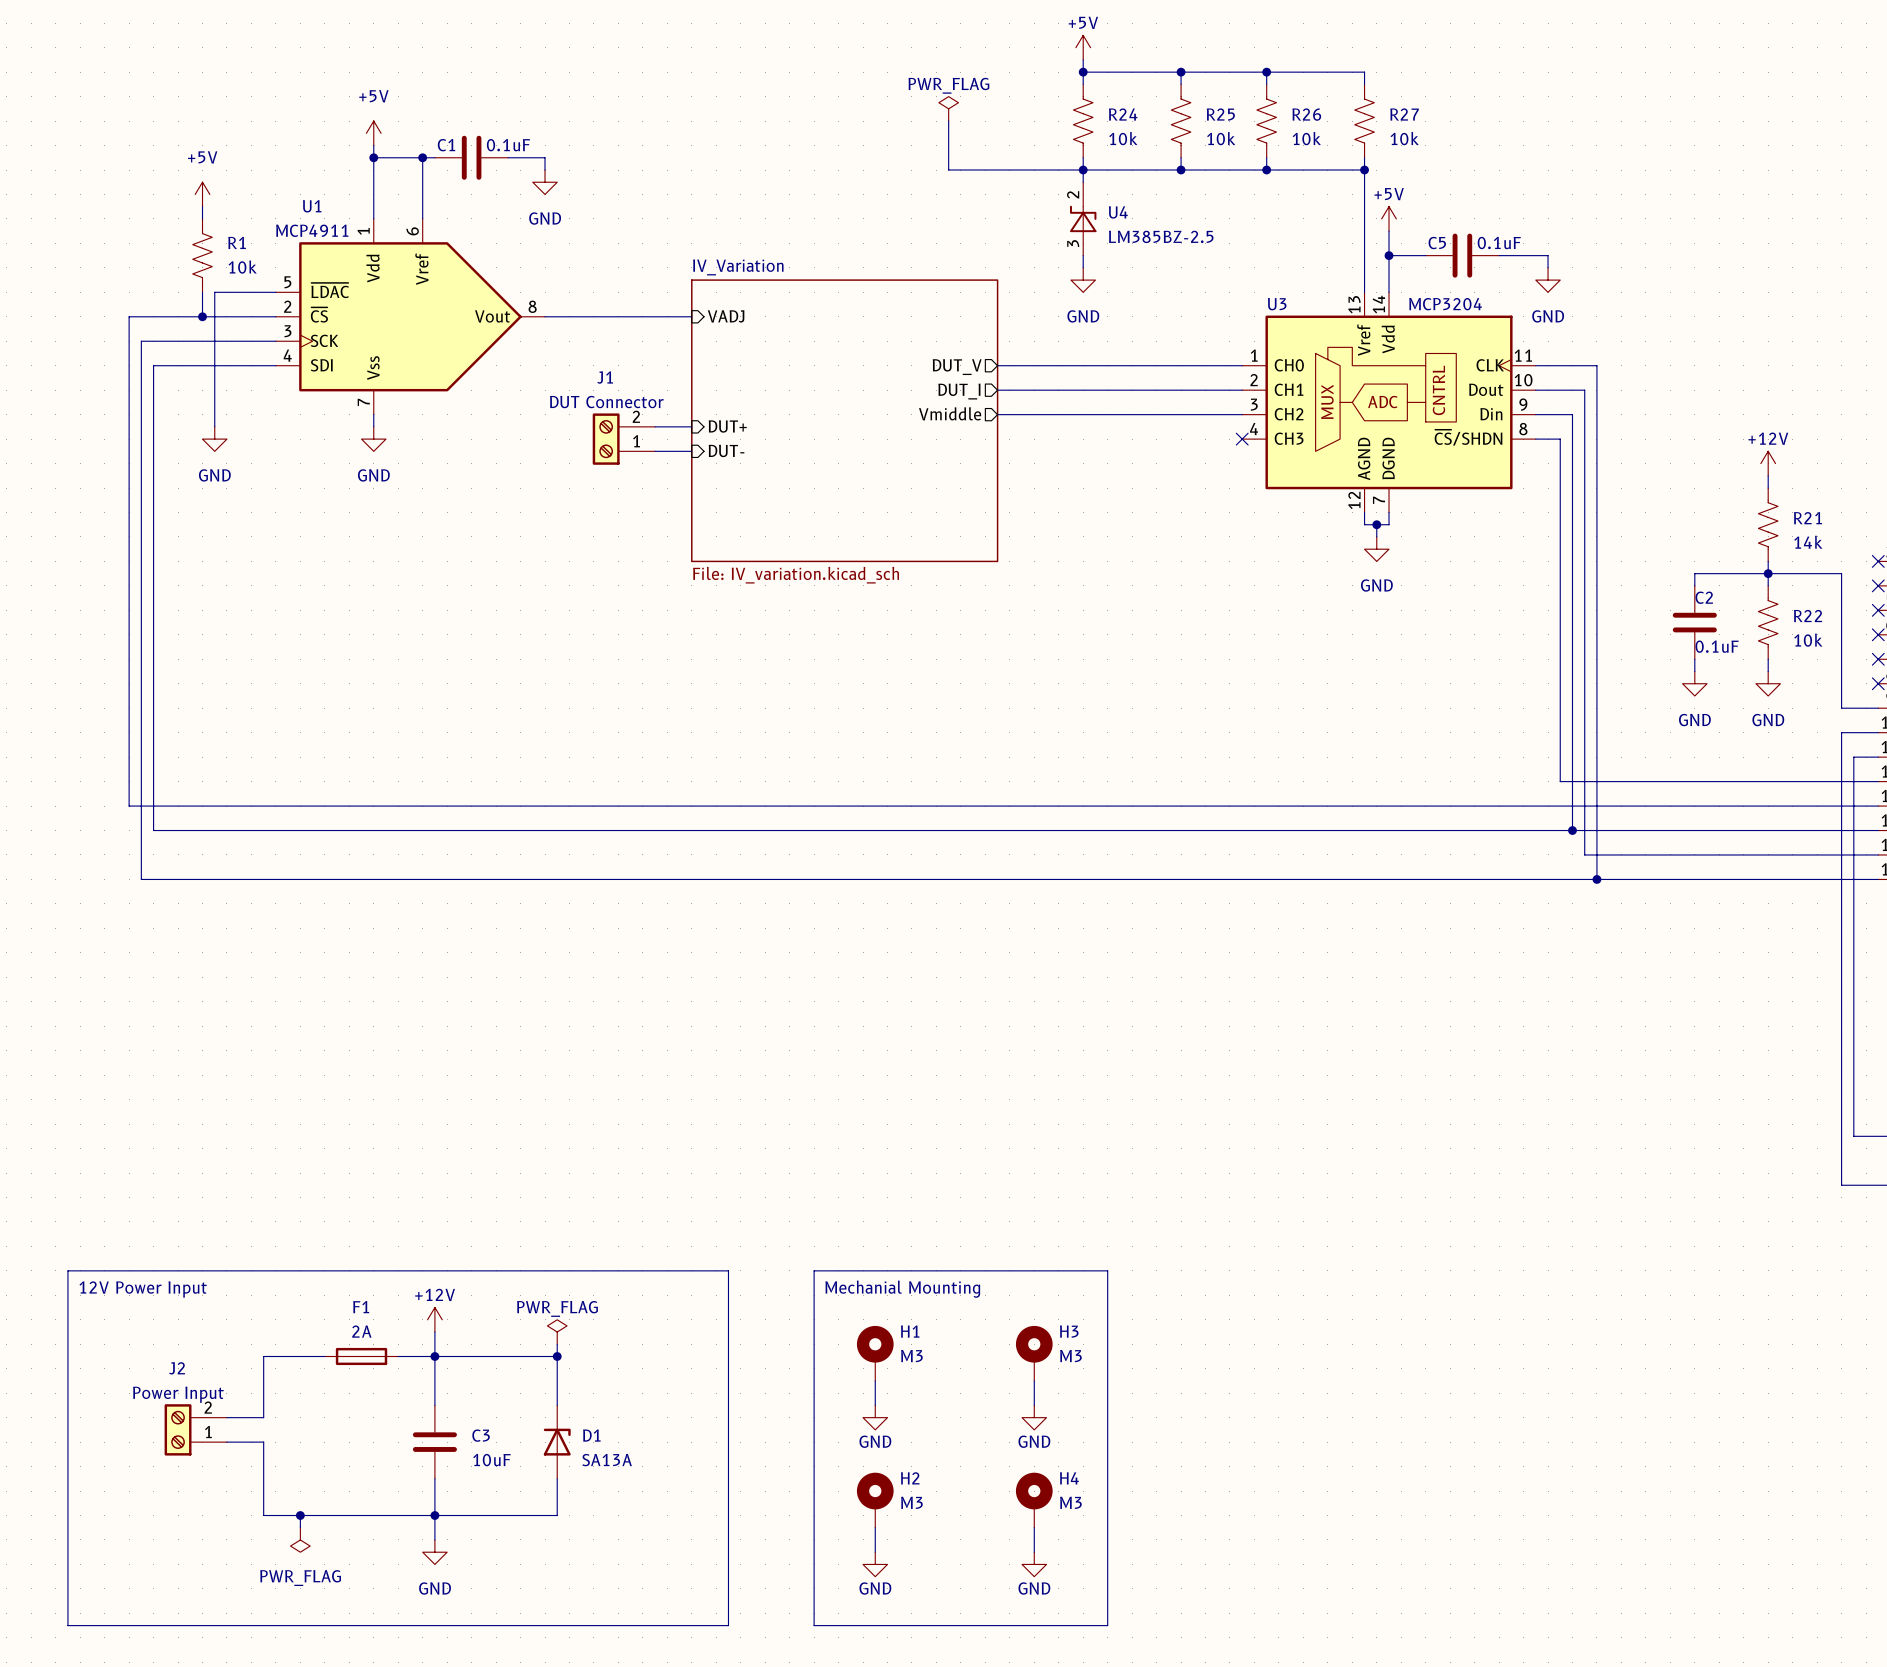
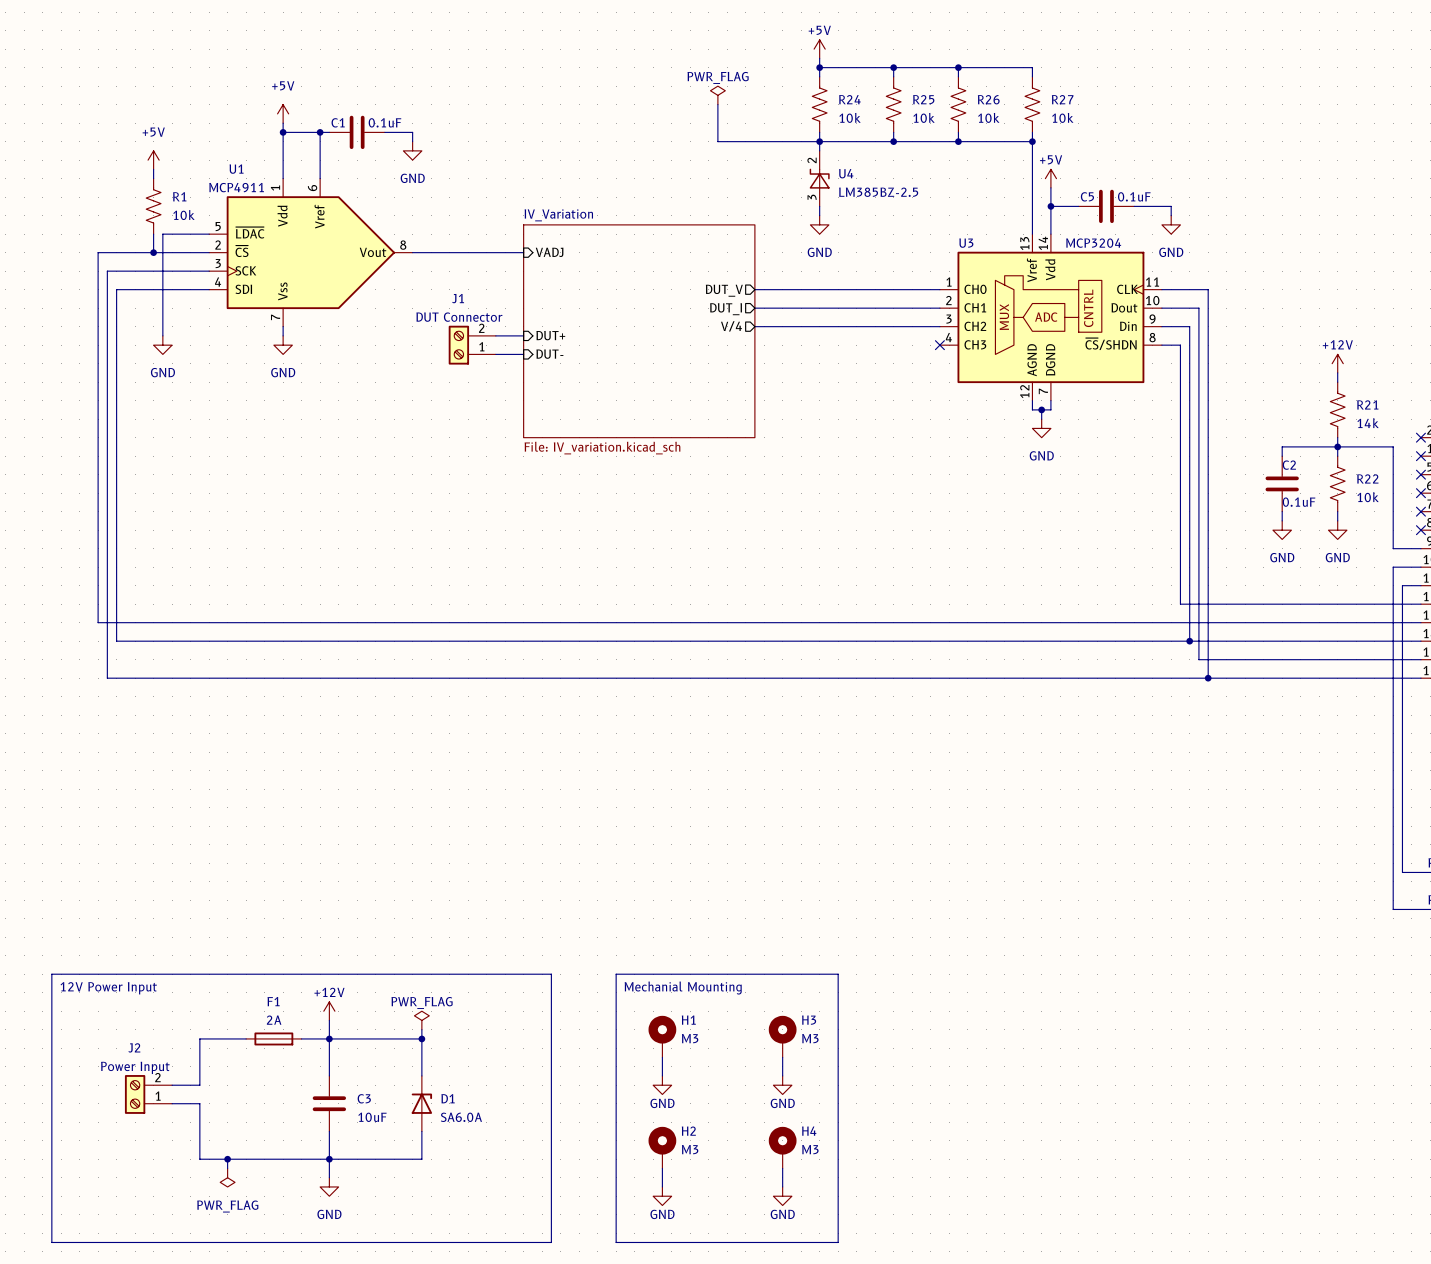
sheet pin: Vmiddle (950, 413) -> V/4 (731, 326)
D1 value: SA13A (607, 1460) -> SA6.0A (461, 1117)

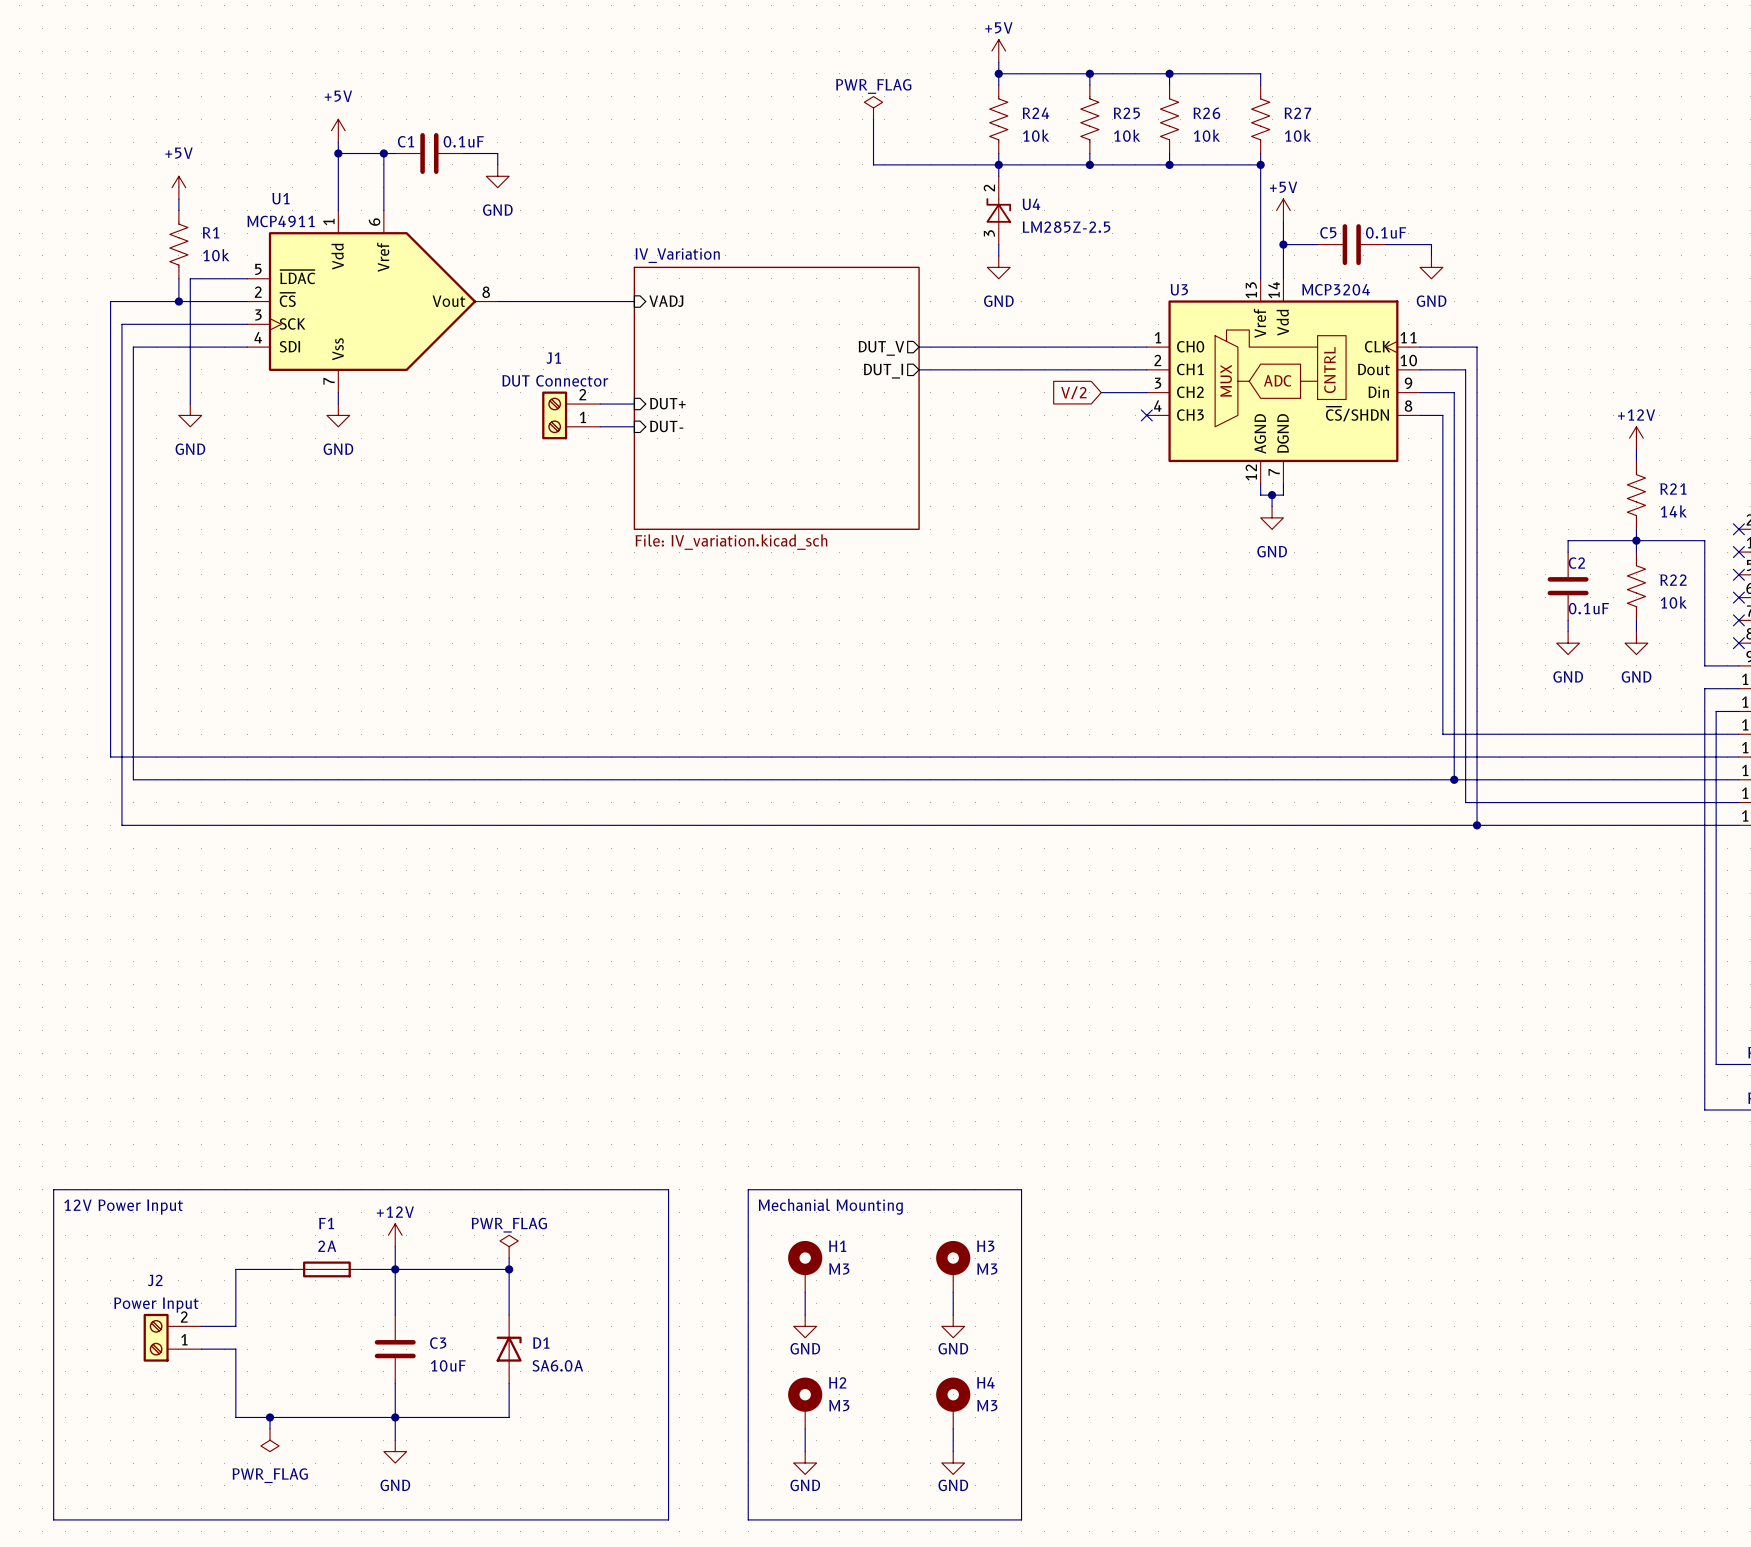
U4 value: LM385BZ-2.5 (878, 192) -> LM285Z-2.5 (1066, 227)
sheet pin: V/4 (731, 326) -> none
wire: (754, 326) (902, 326) -> none
global label: none -> V/2 (1073, 392)

